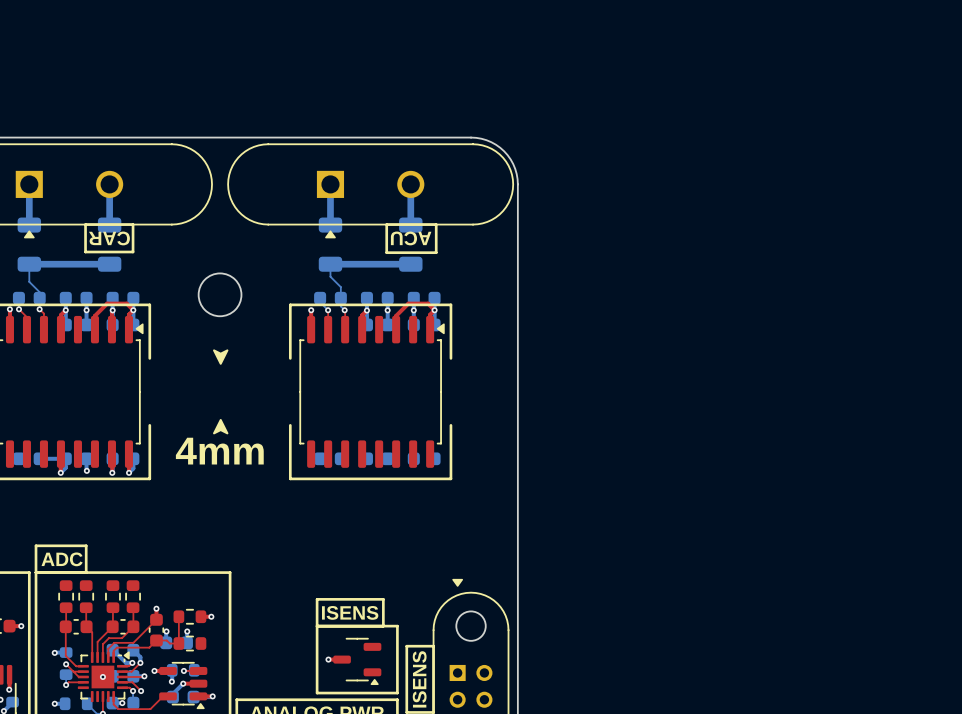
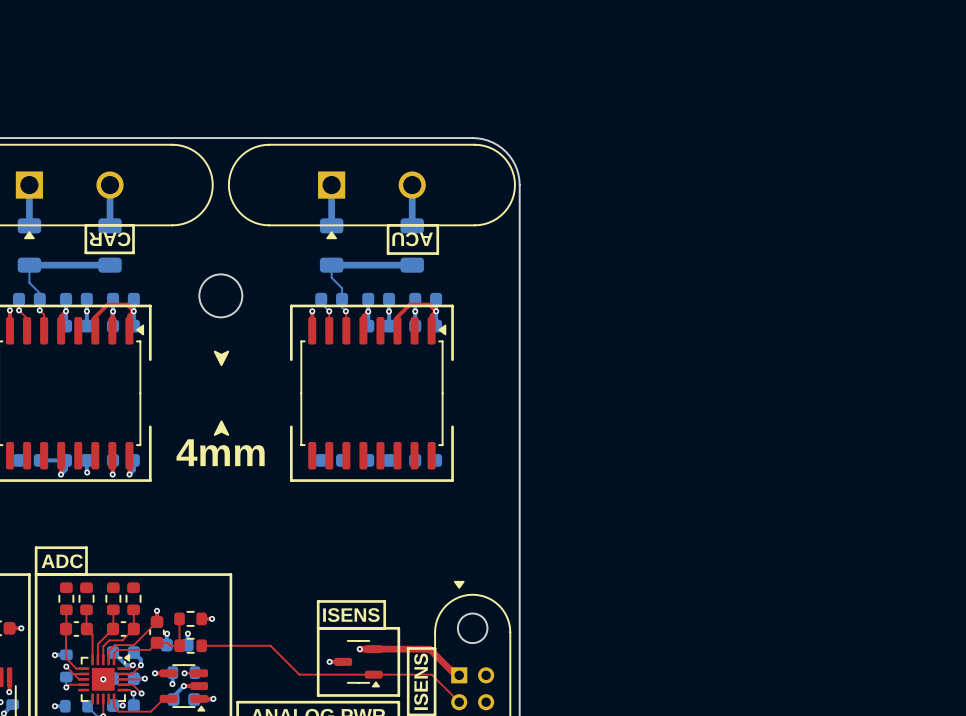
top track: none -> (201, 645) (270, 645) (299, 674) (431, 674) (459, 702)
top track: none -> (359, 649) (429, 649) (455, 675) (459, 675)
via: none -> (359, 649)

